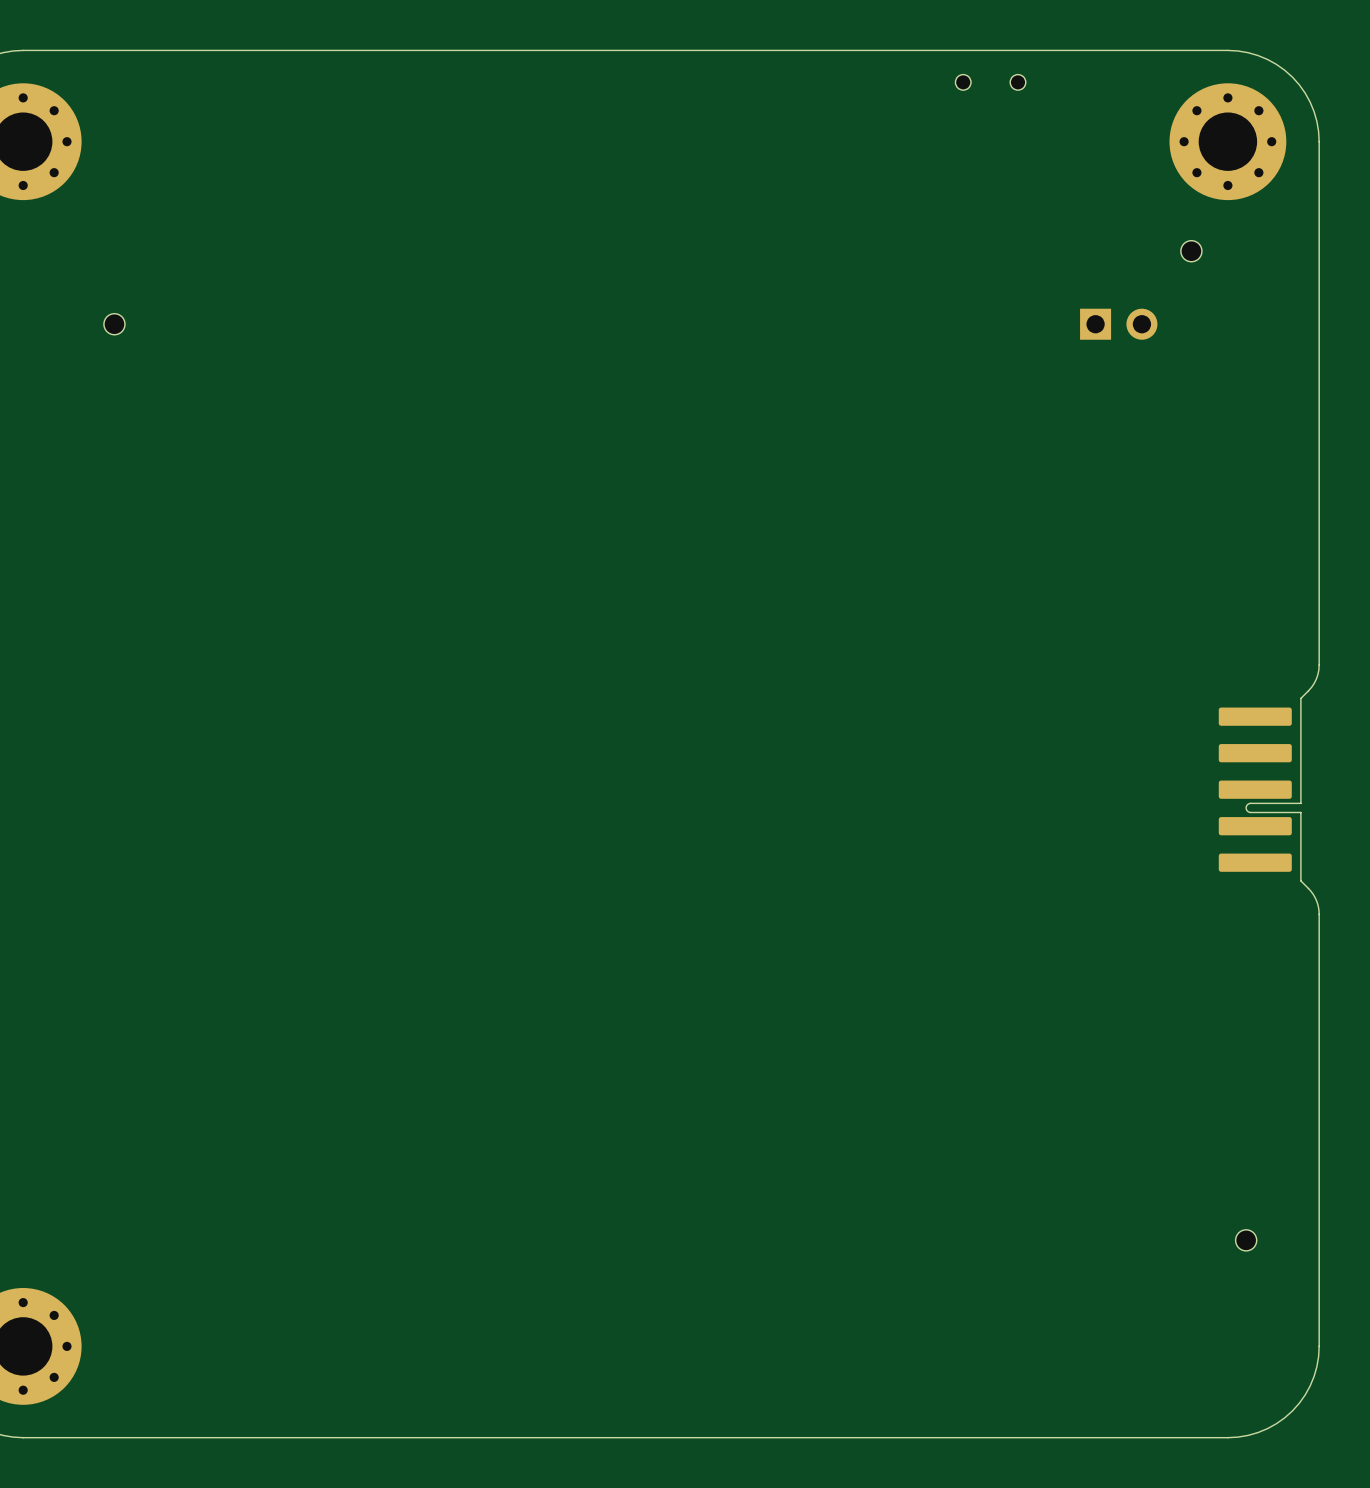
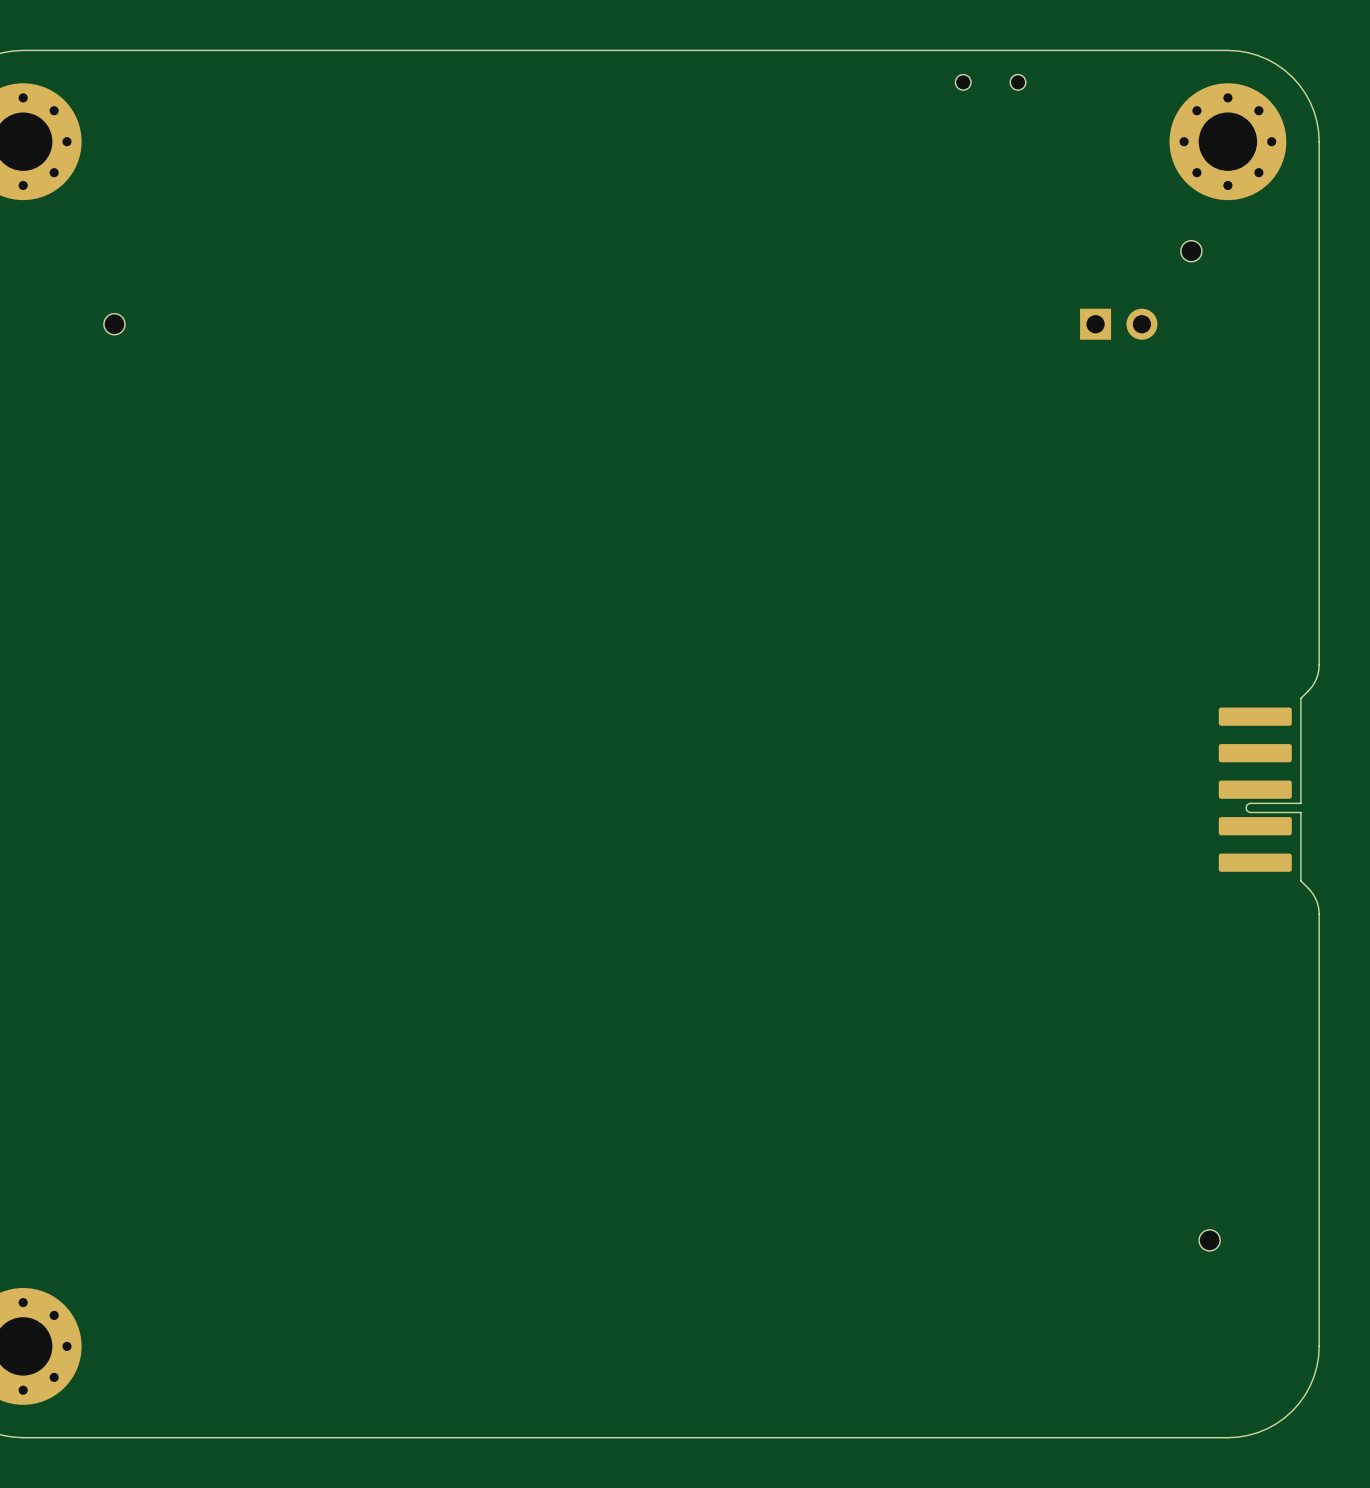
part position: (1246, 1240) -> (1209, 1240)

